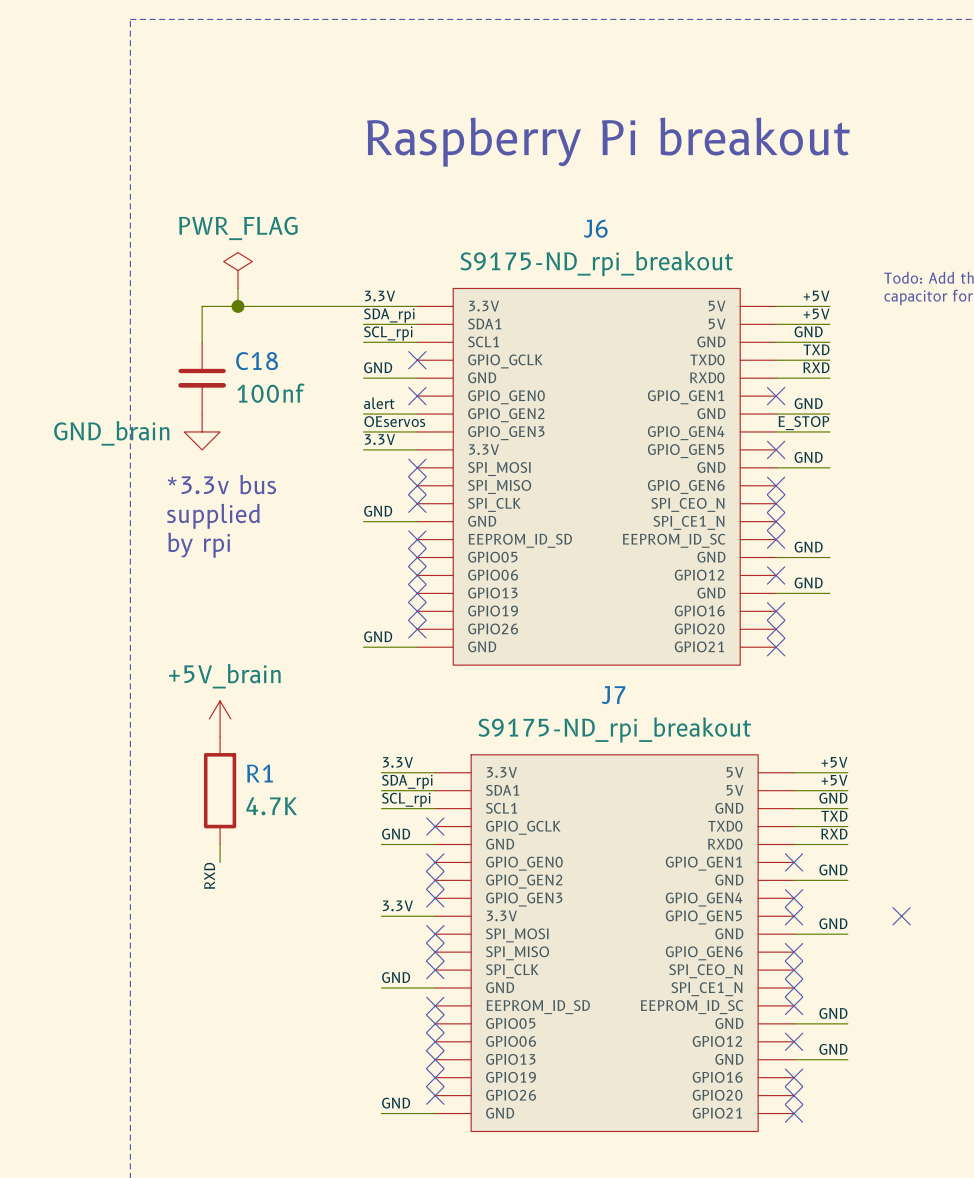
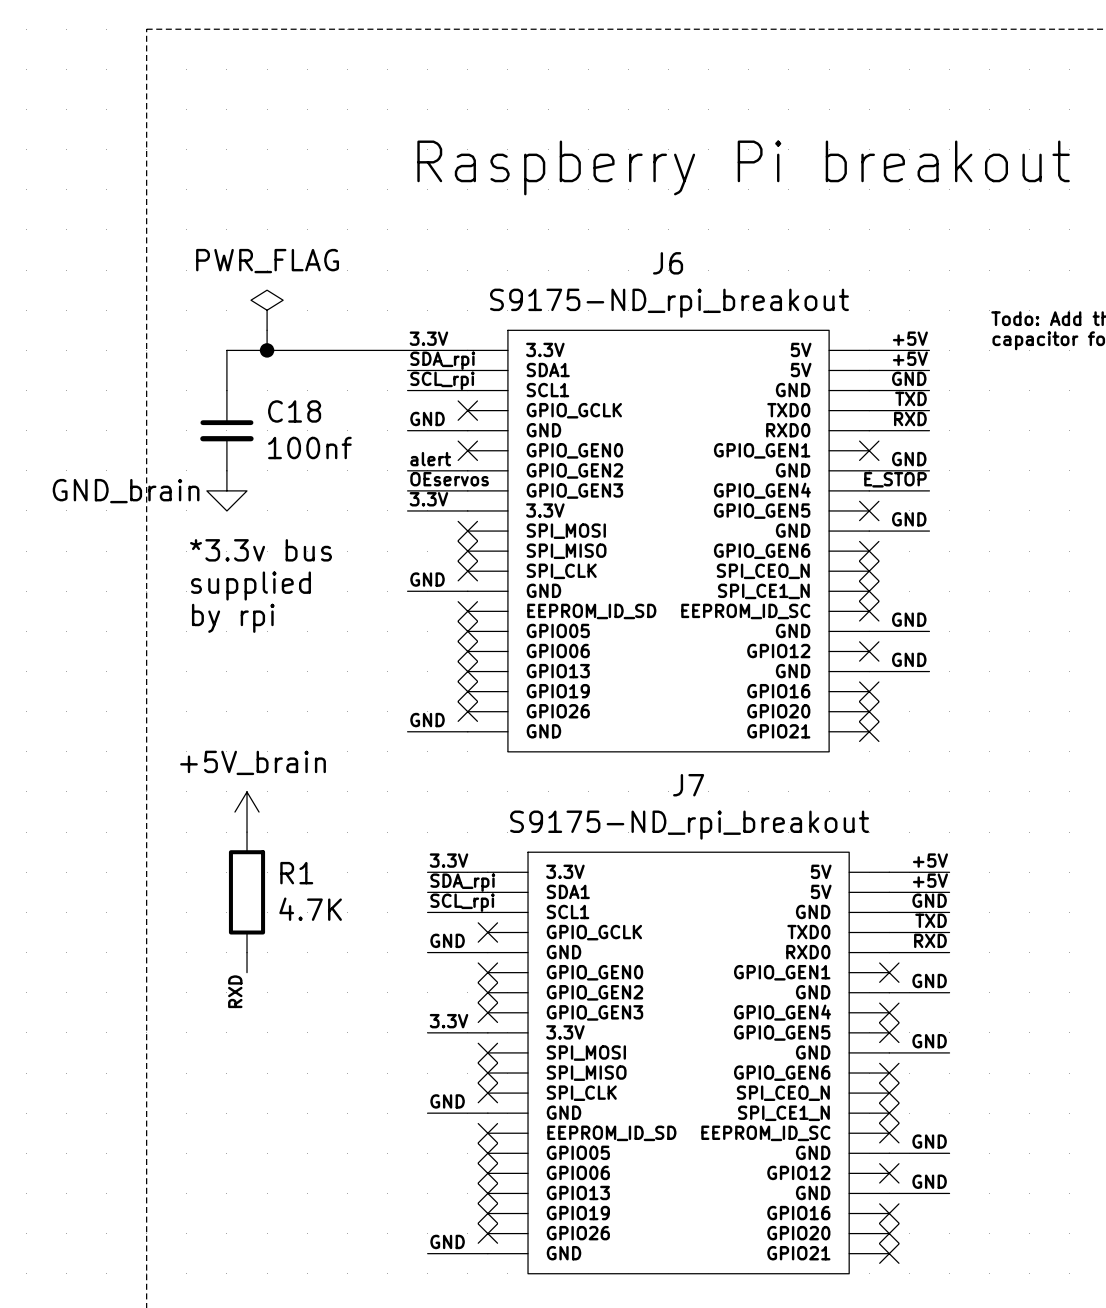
no-connect mark: (901, 916) -> none

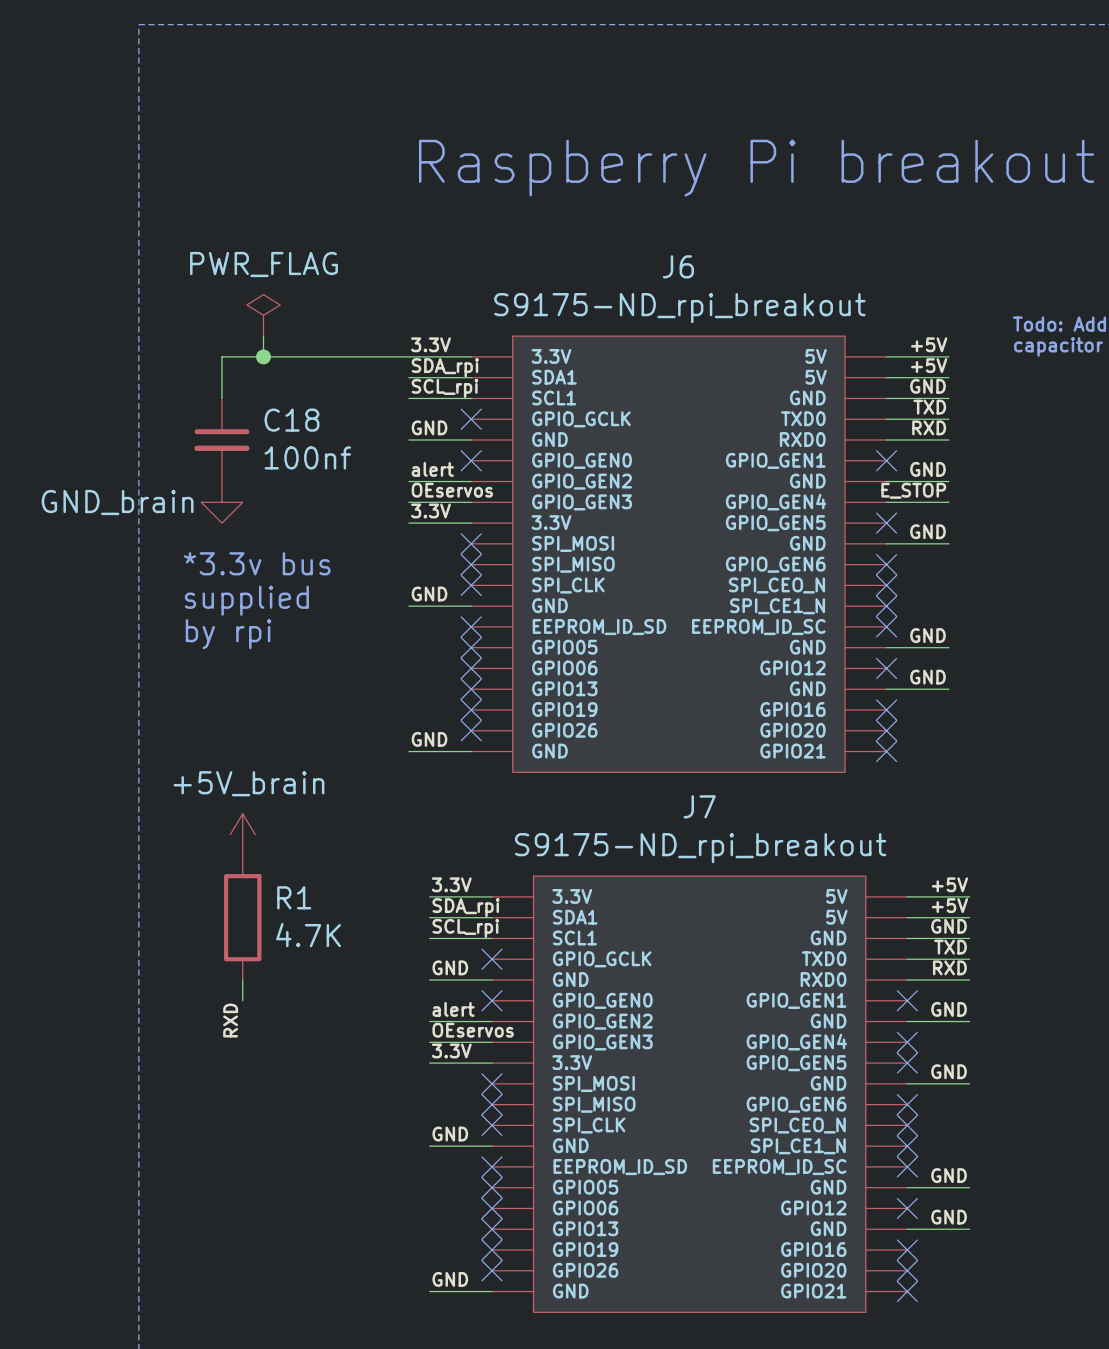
label: none -> alert (453, 1009)
wire: none -> (429, 1021) (491, 1021)
no-connect mark: (487, 992) -> none
label: none -> OEservos (473, 1030)
wire: none -> (429, 1042) (491, 1042)
no-connect mark: (487, 1012) -> none

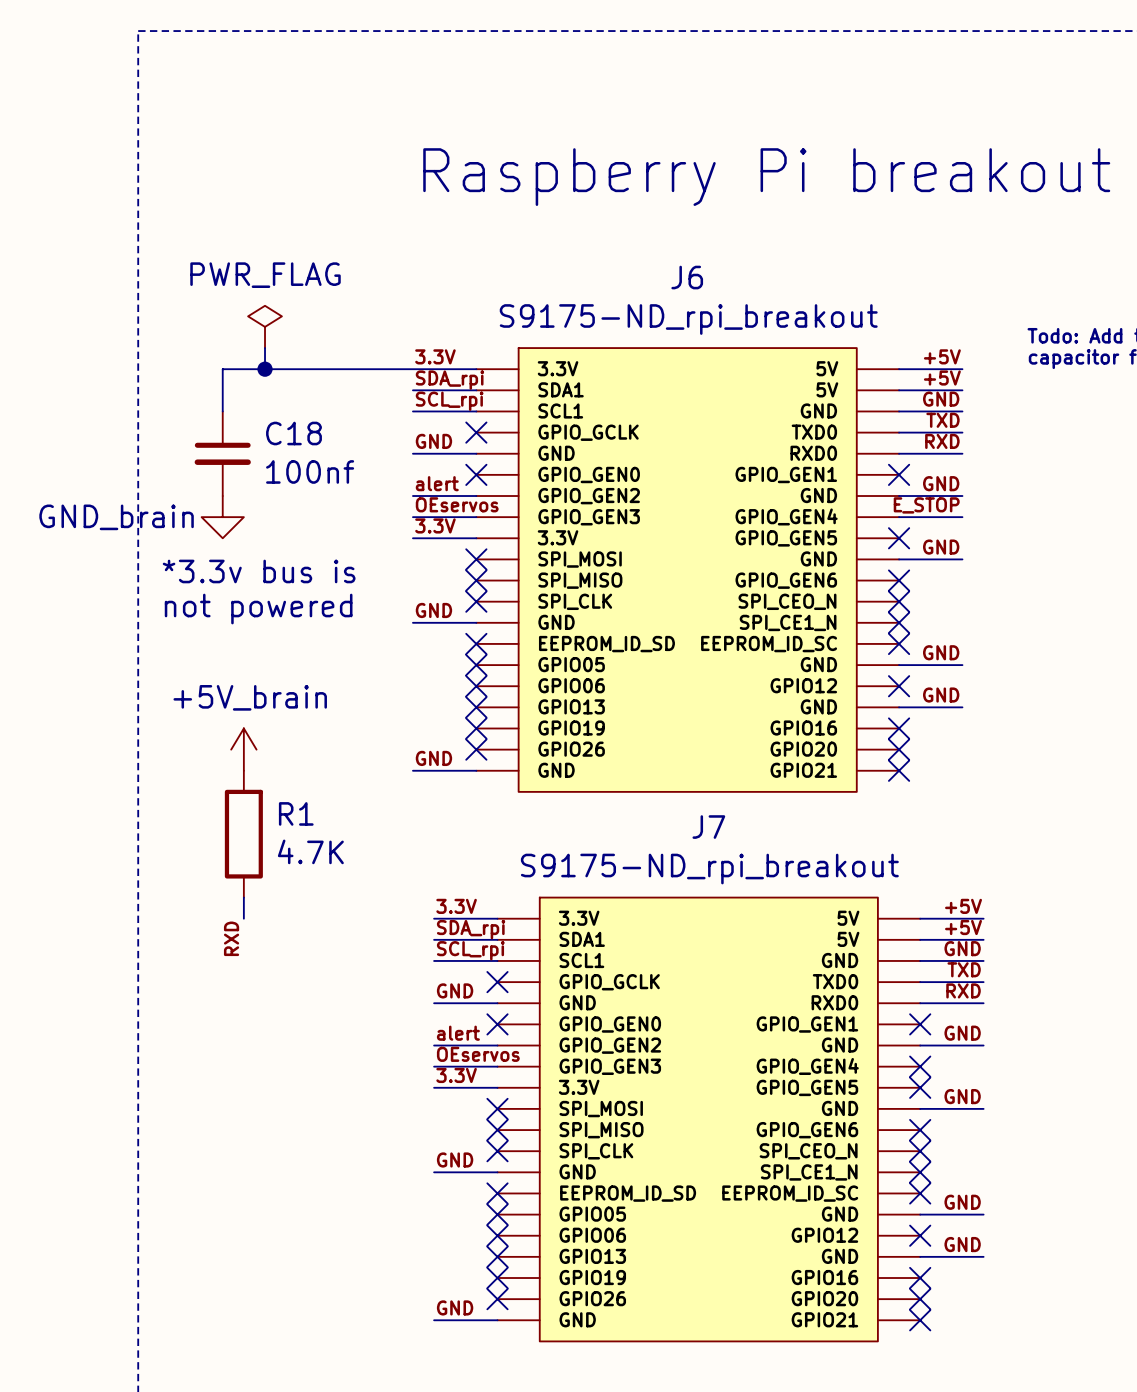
text: *3.3v bus (257, 563) -> *3.3v bus is (259, 571)
text: none -> not powered (258, 609)
text: supplied (246, 600) -> none
text: by rpi (228, 634) -> none
power symbol position: +5V_brain (242, 834) -> +5V_brain (243, 749)
R1 position: (242, 917) -> (243, 834)
wire: (242, 980) (242, 1000) -> (243, 897) (243, 918)
label position: RXD (230, 1020) -> RXD (231, 938)

